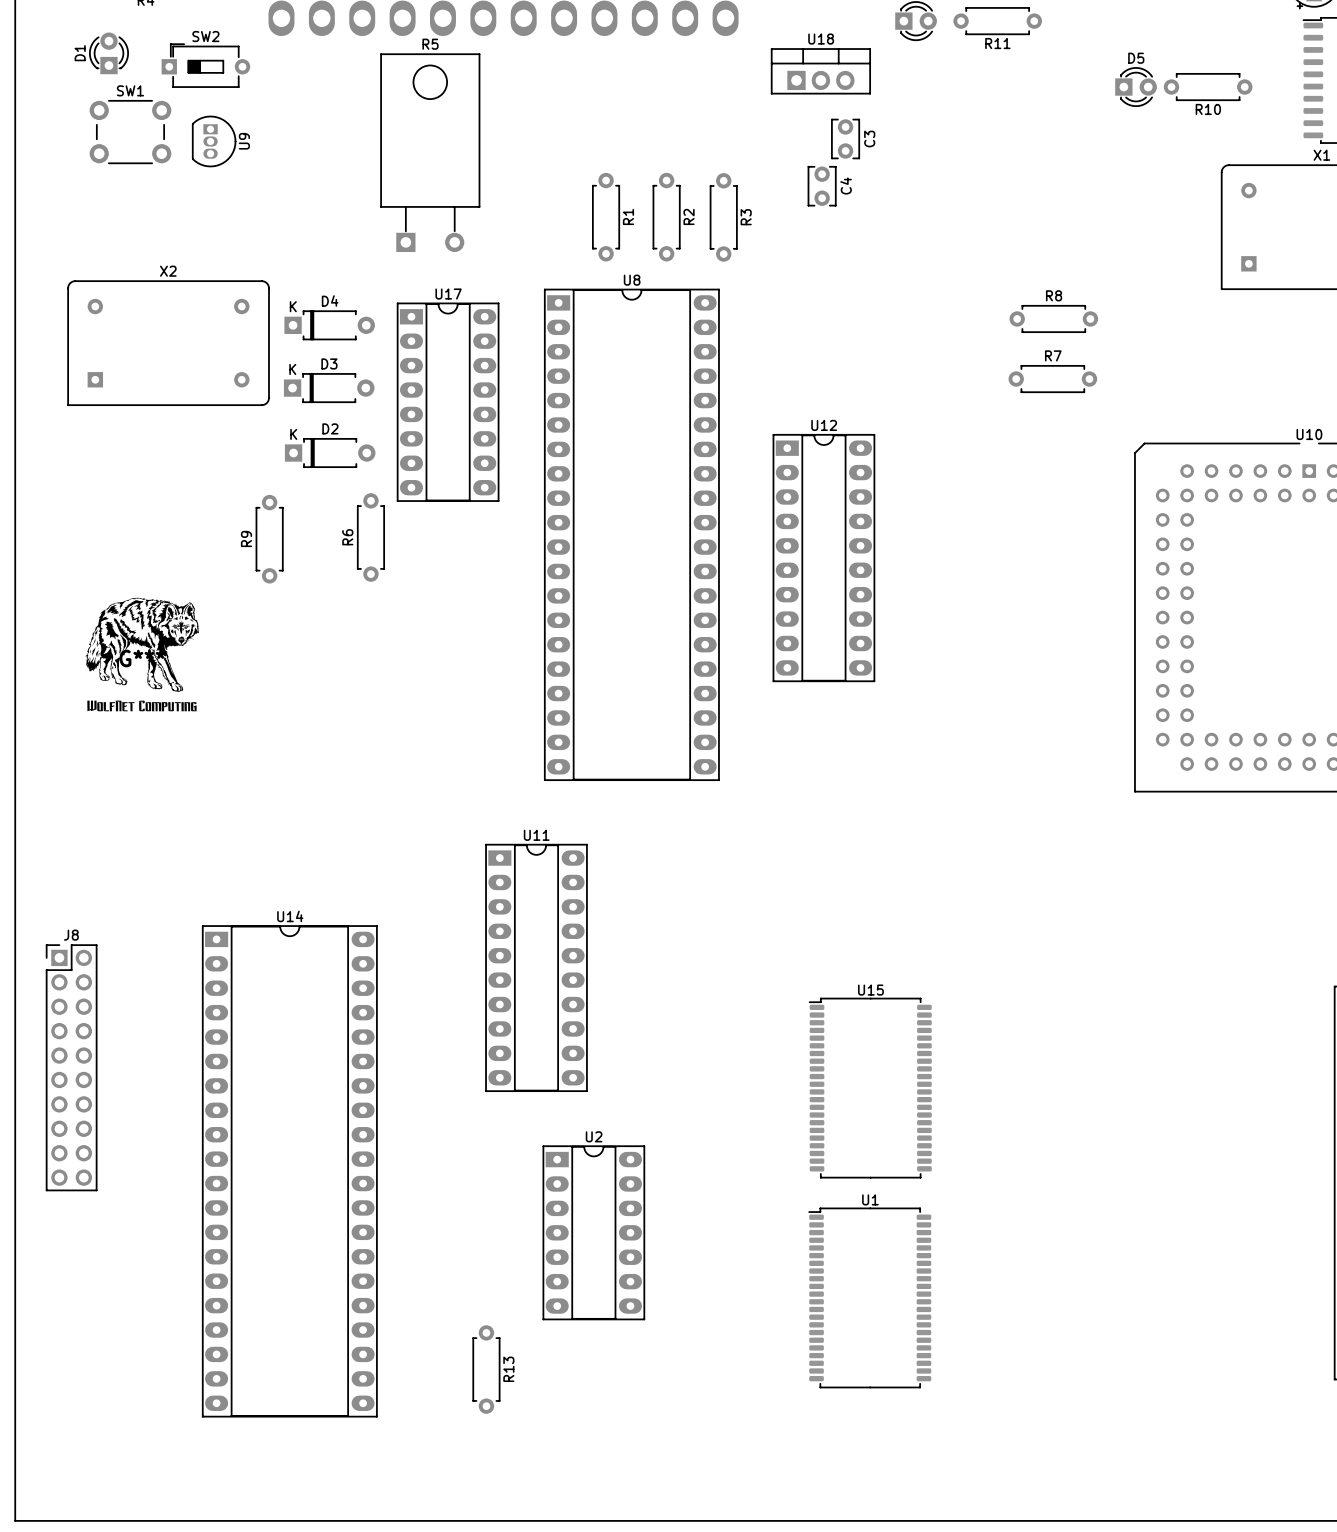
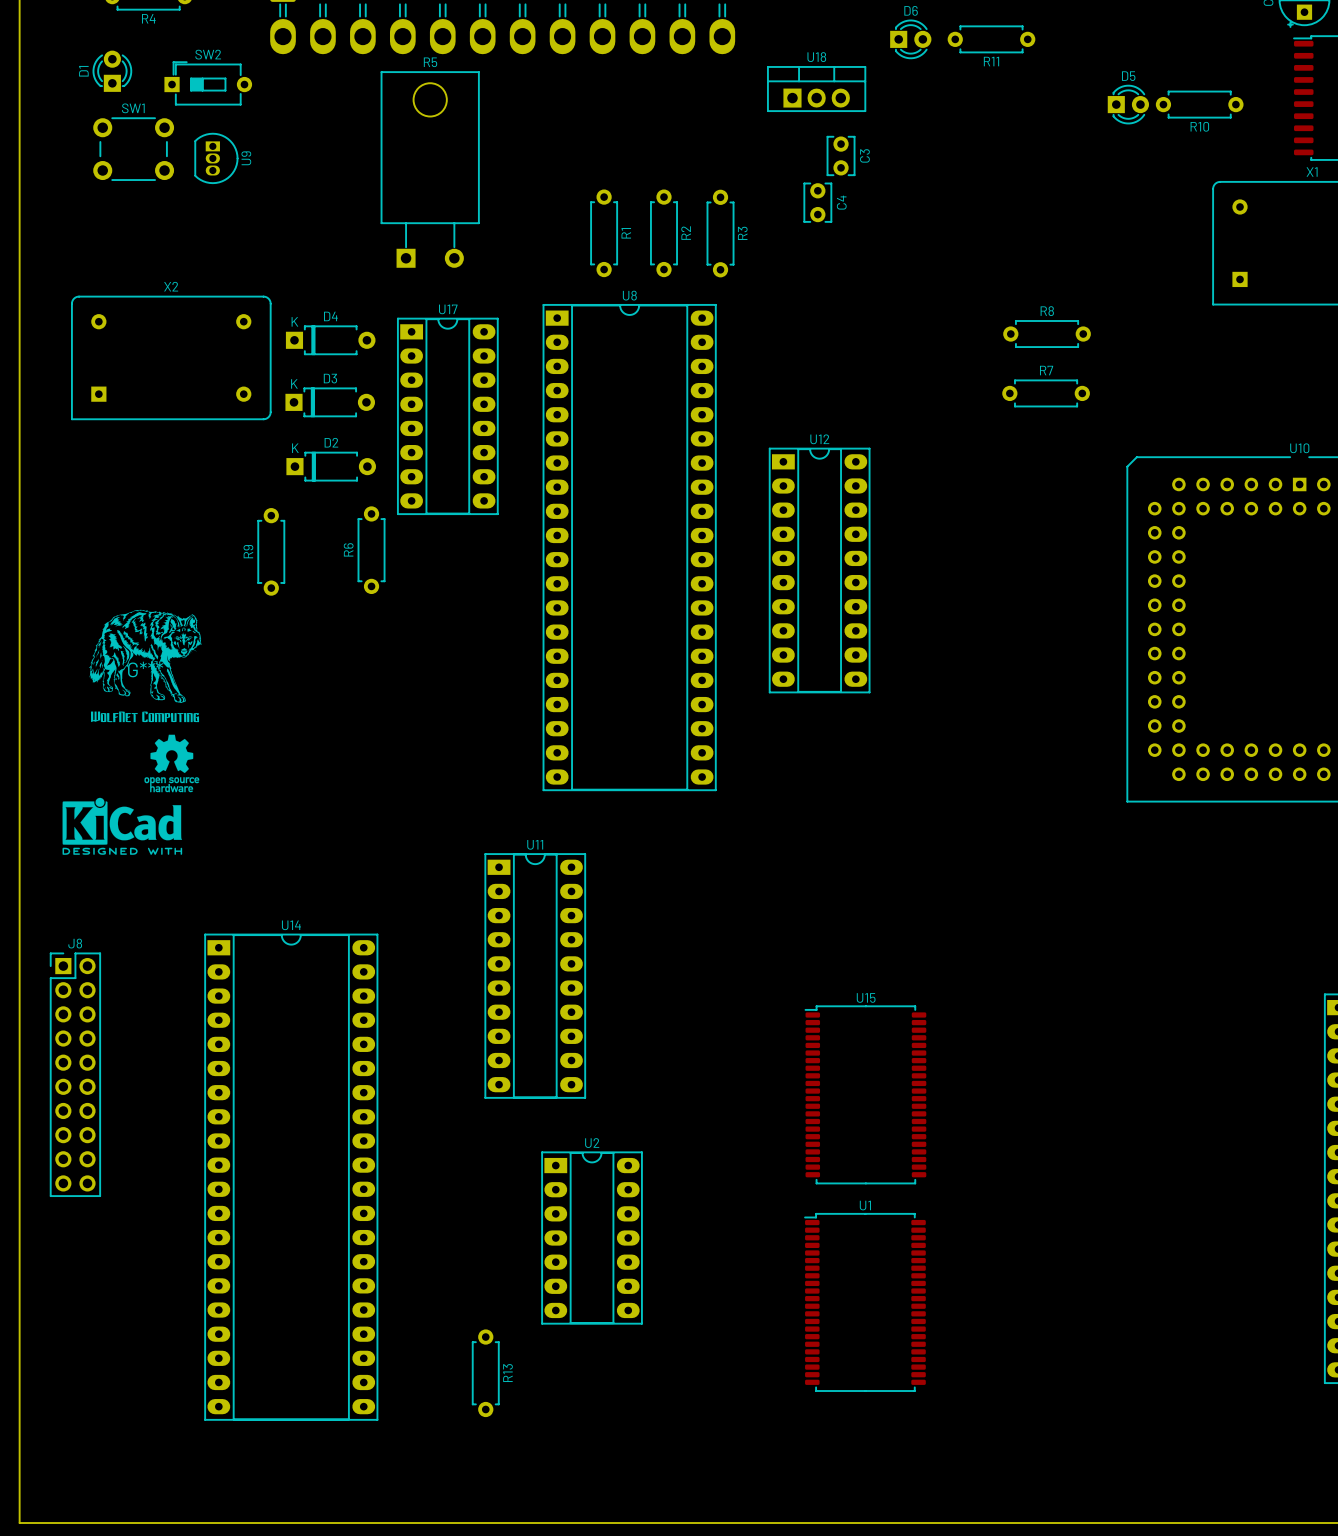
drawing: none -> [62, 734, 200, 855]

